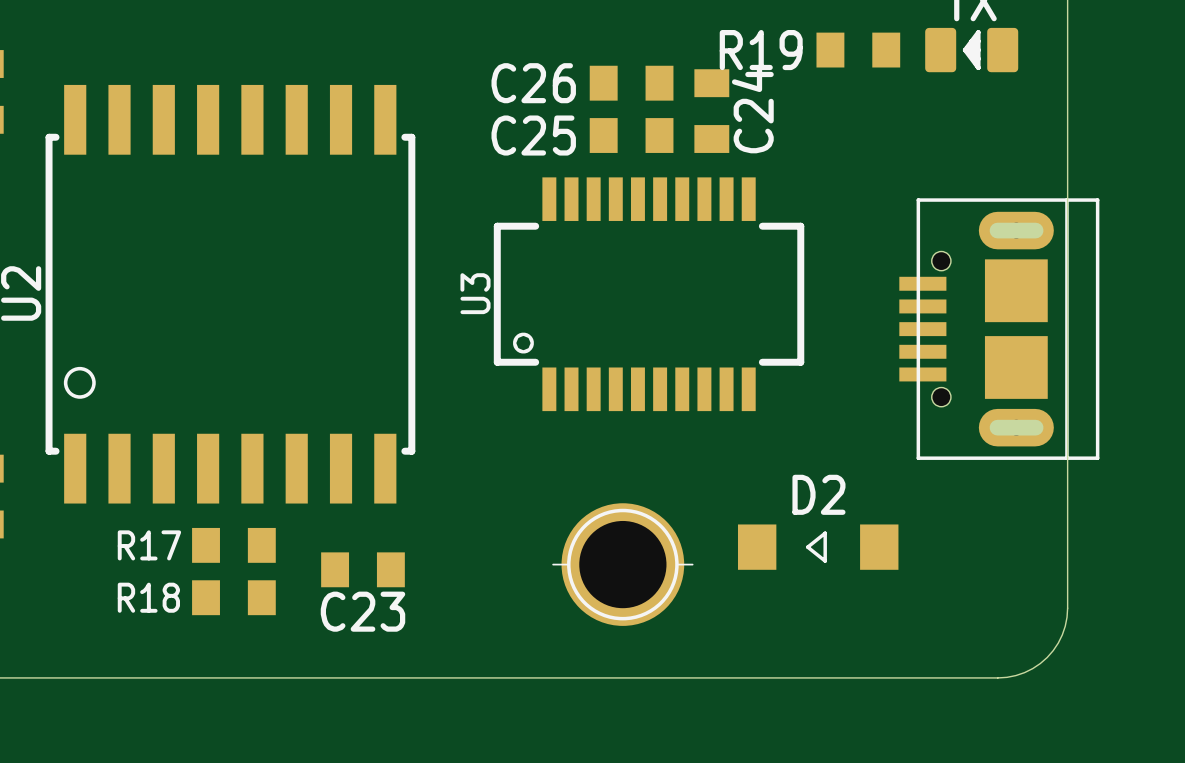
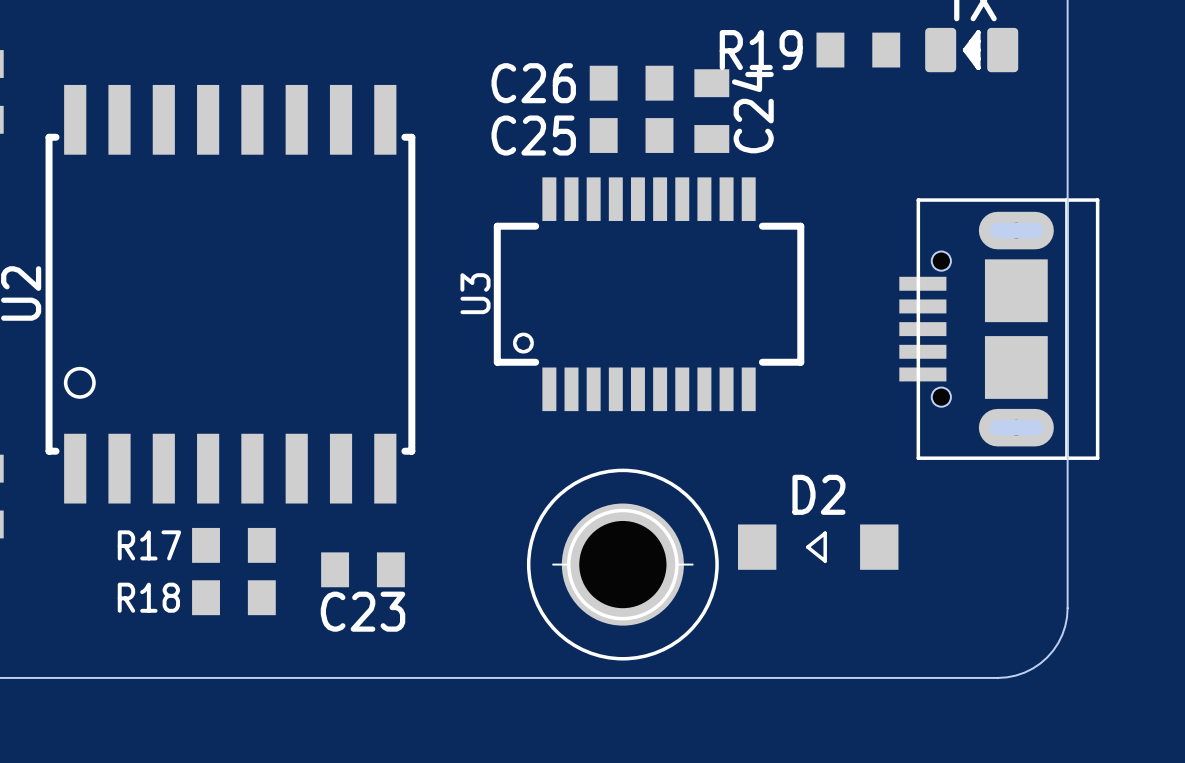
part footprint: [552, 503, 694, 626] -> [526, 468, 719, 661]

